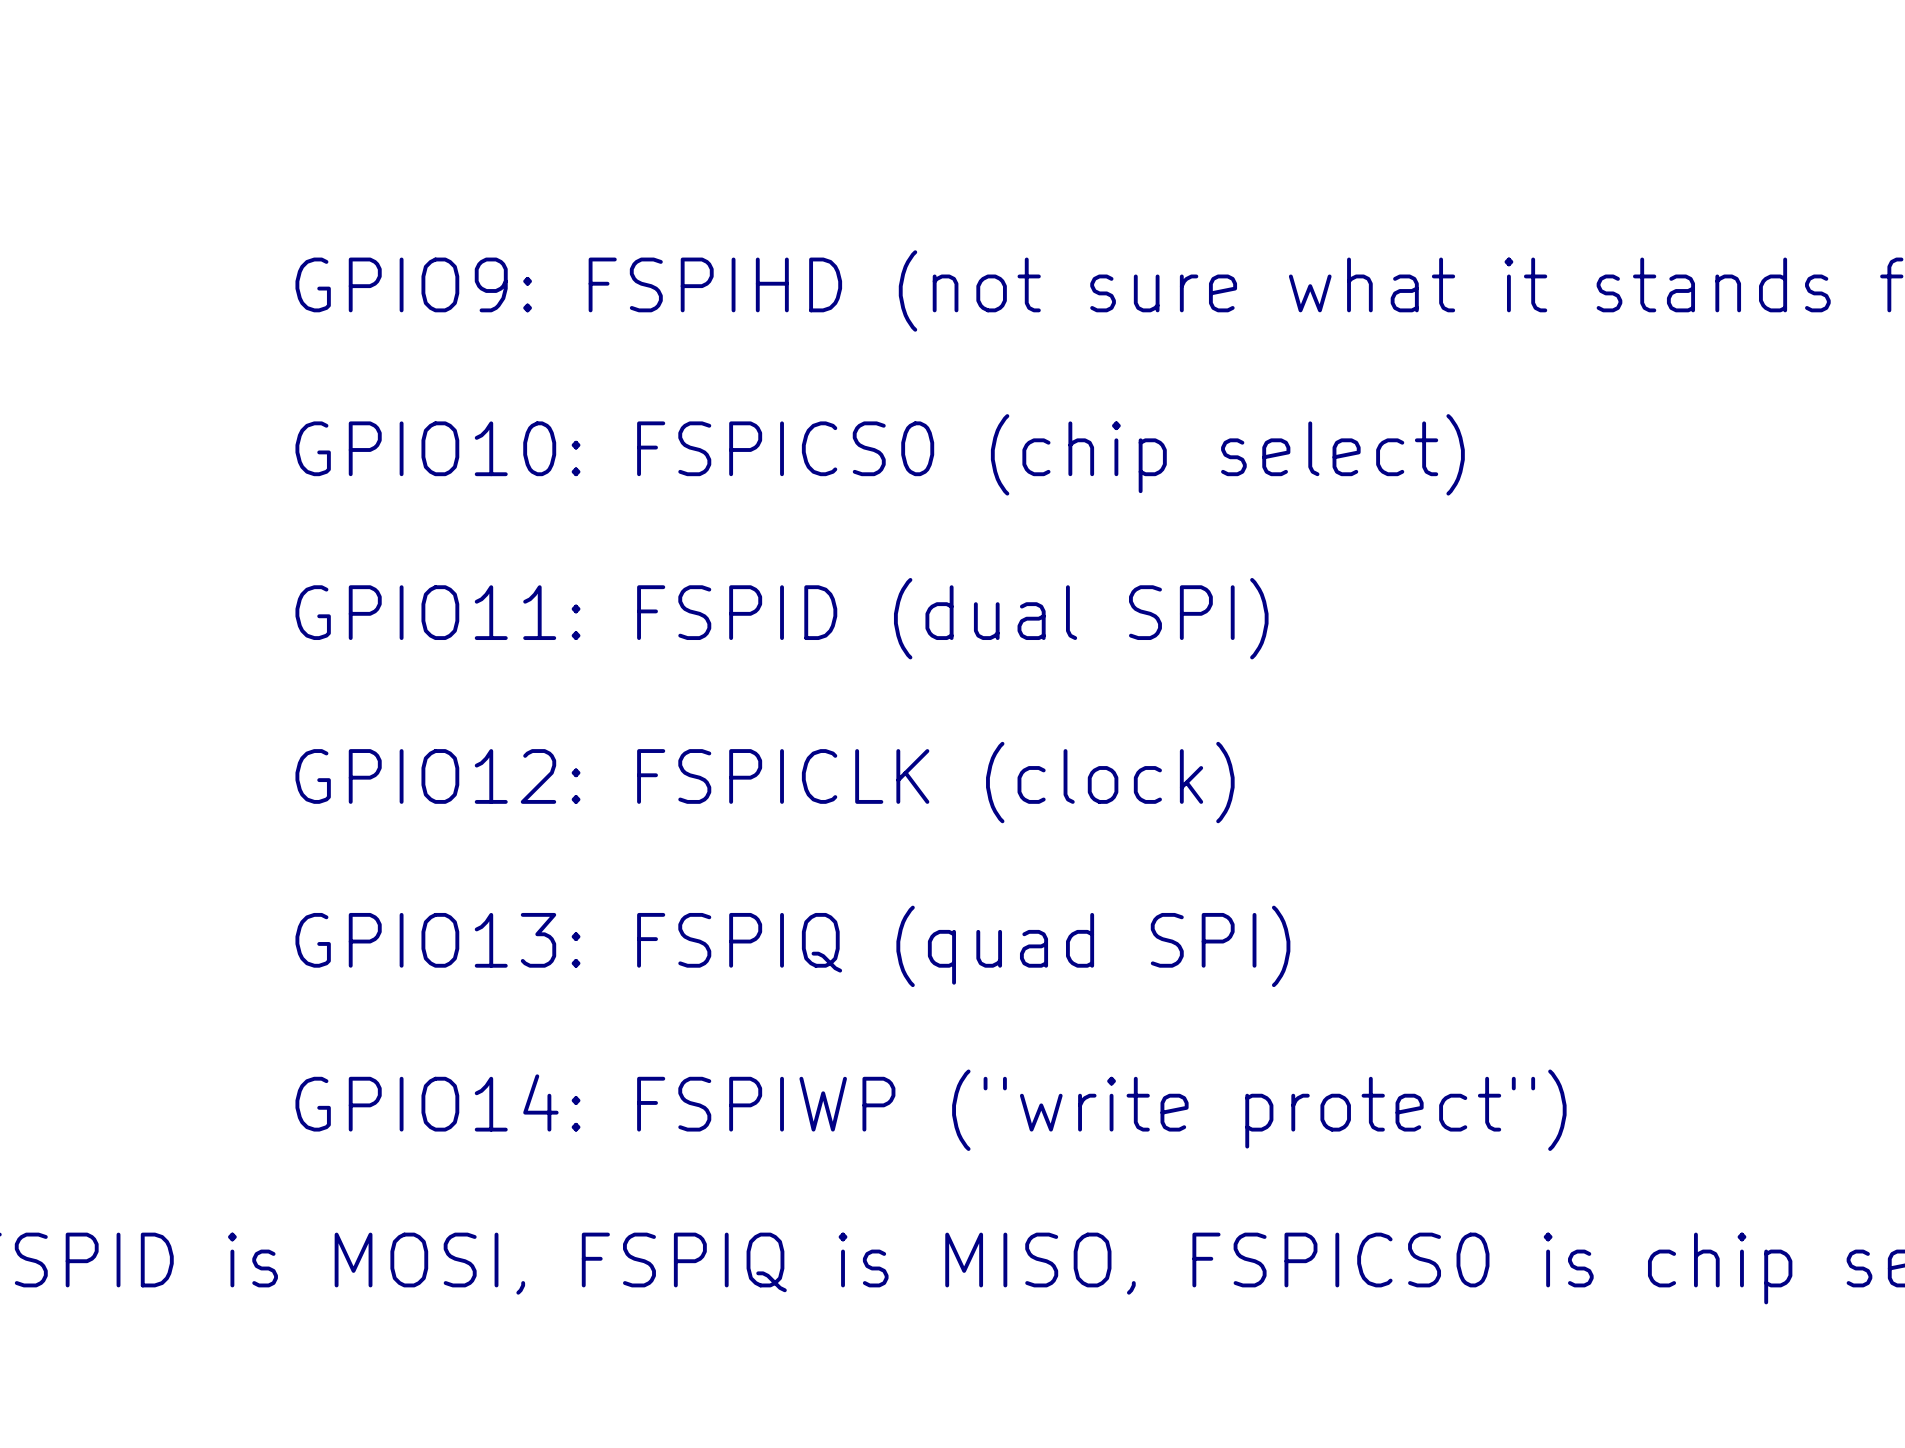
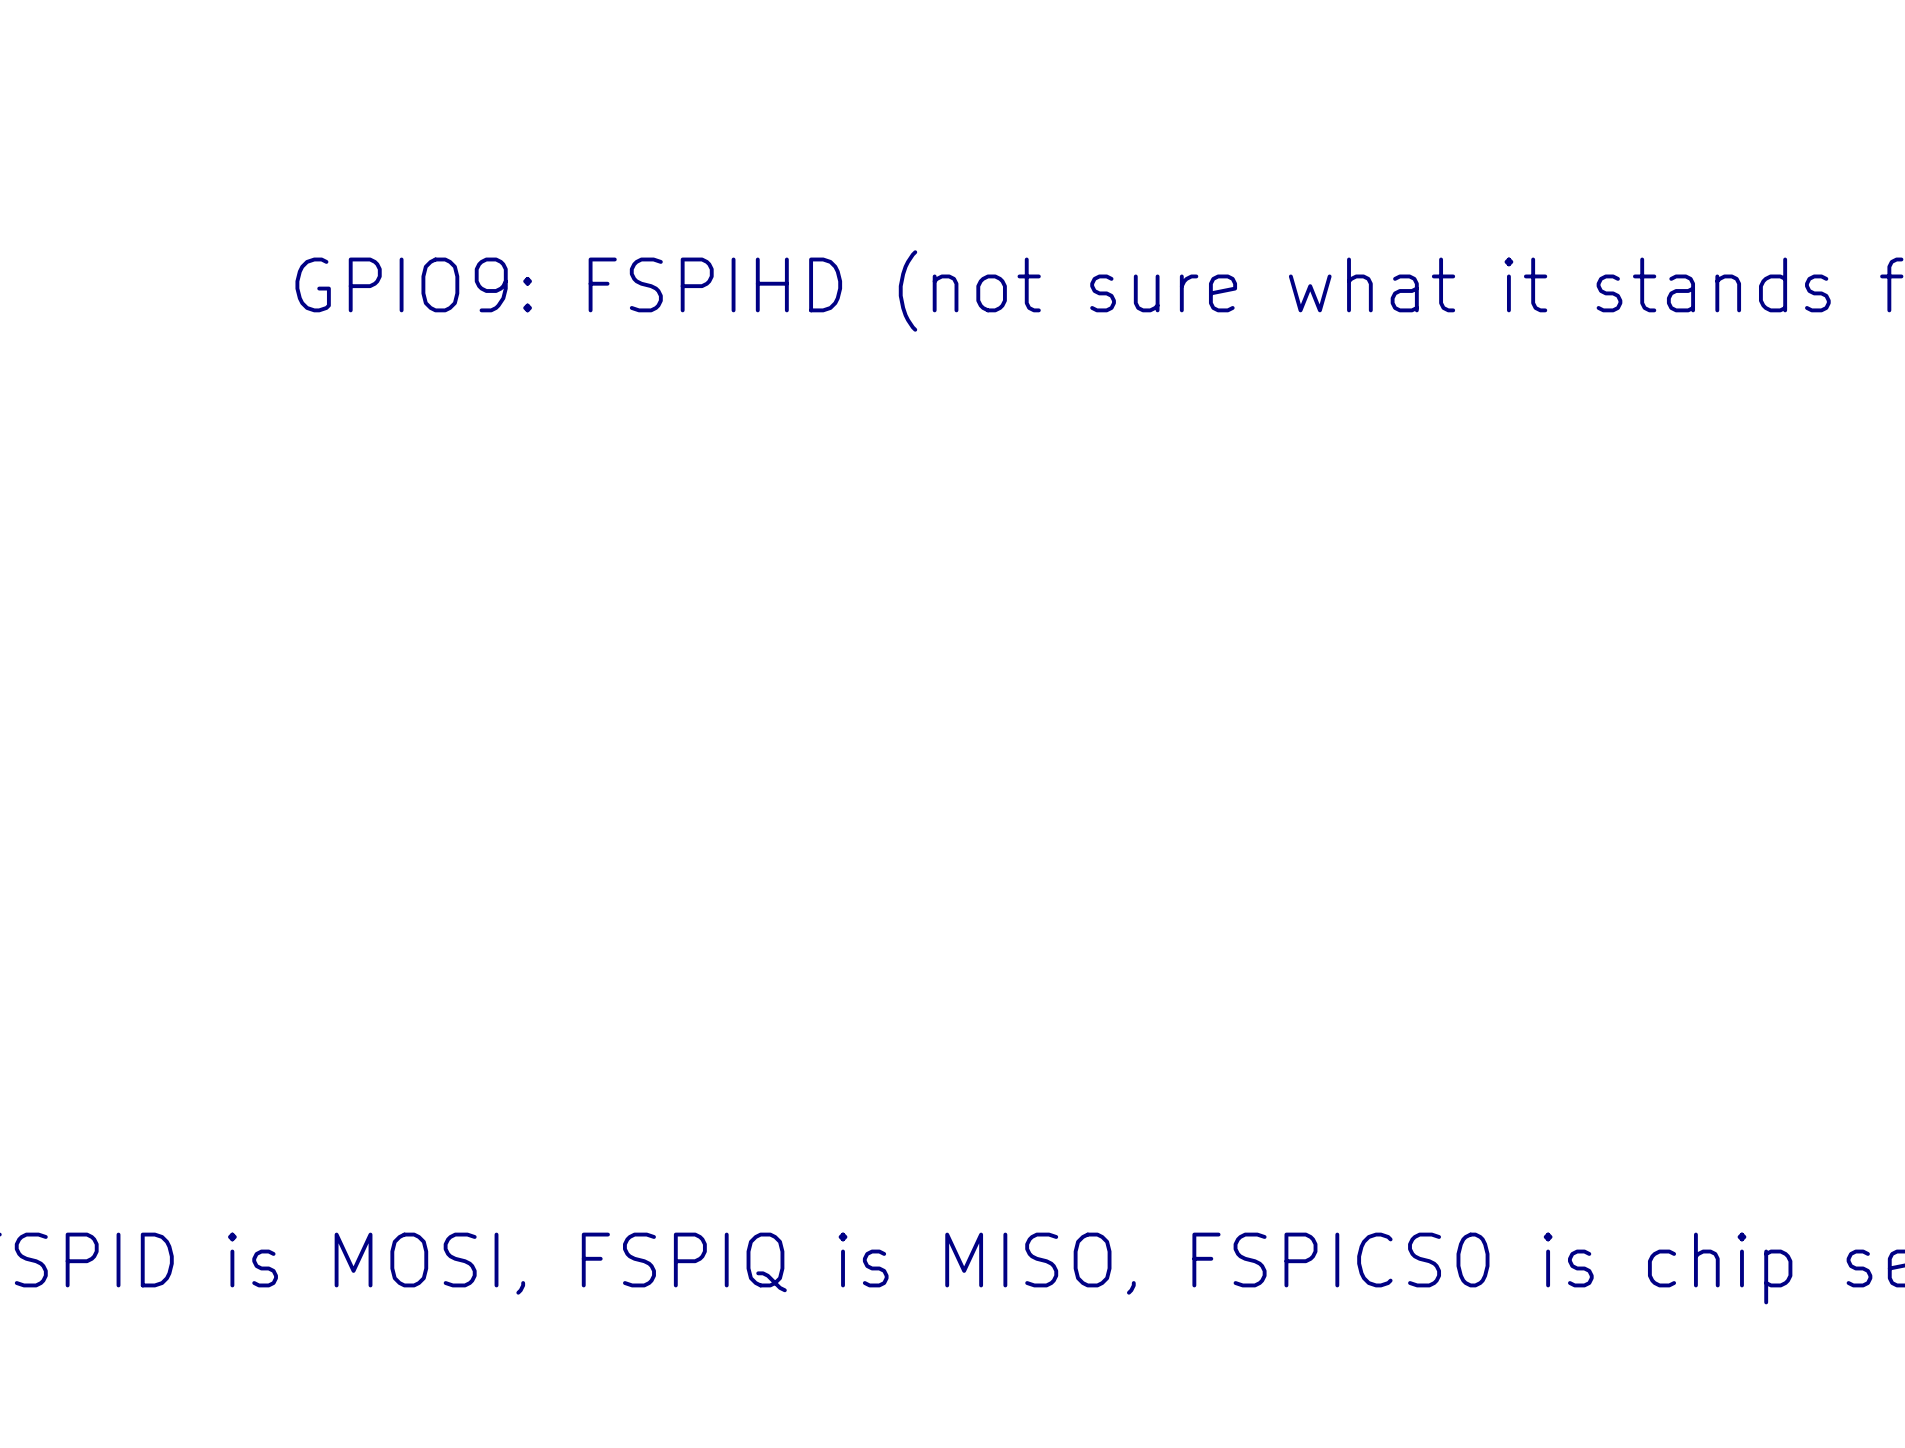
text: GPIO10: FSPICS0 (chip select) (880, 454) -> none
text: GPIO11: FSPID (dual SPI) (782, 618) -> none
text: GPIO12: FSPICLK (clock) (765, 782) -> none
text: GPIO13: FSPIQ (quad SPI) (792, 946) -> none
text: GPIO14: FSPIWP ("write protect") (931, 1110) -> none

